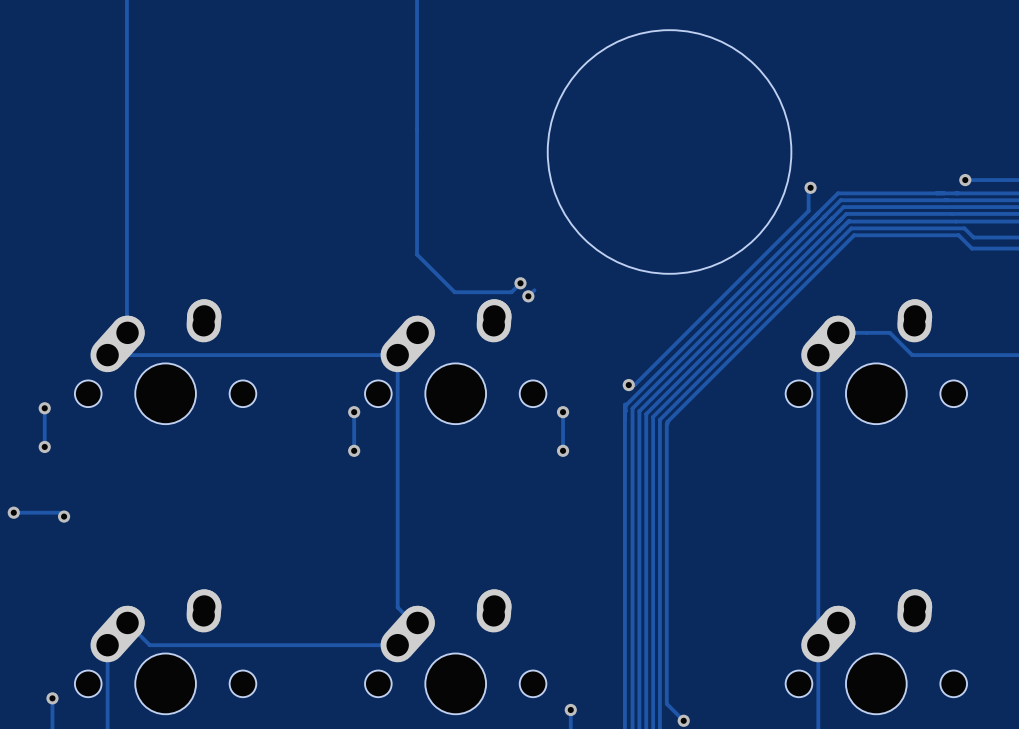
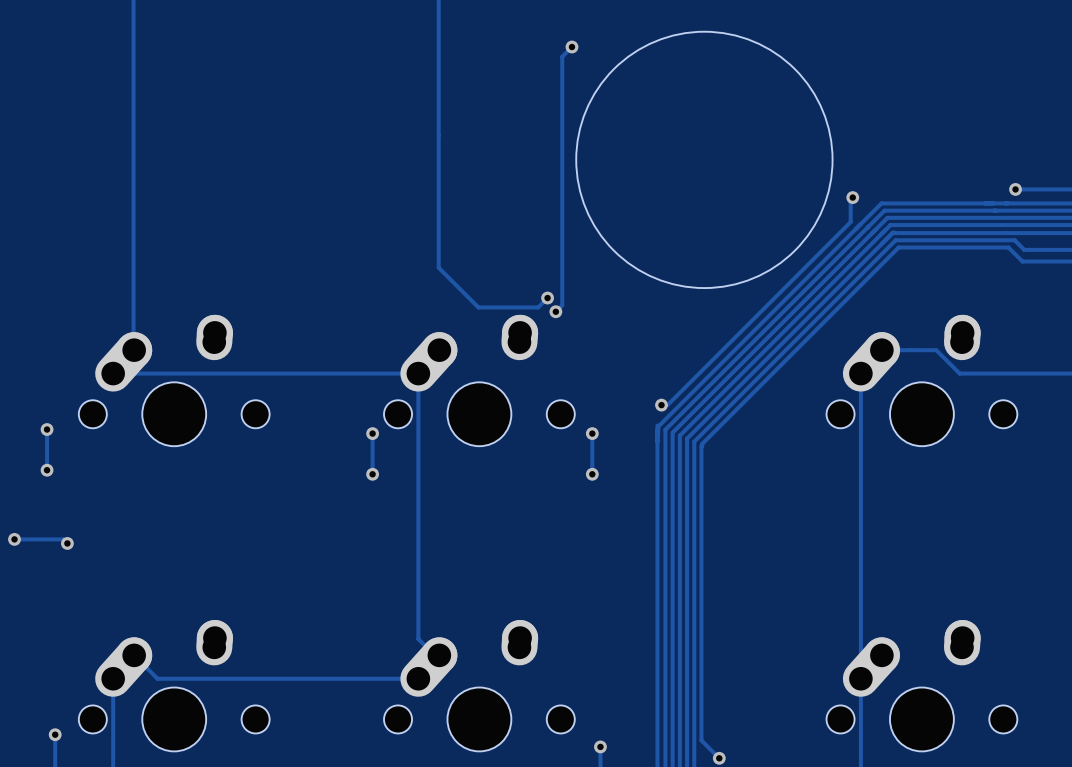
track: none -> (571, 47) (562, 56) (562, 305)
via: none -> (571, 47)

